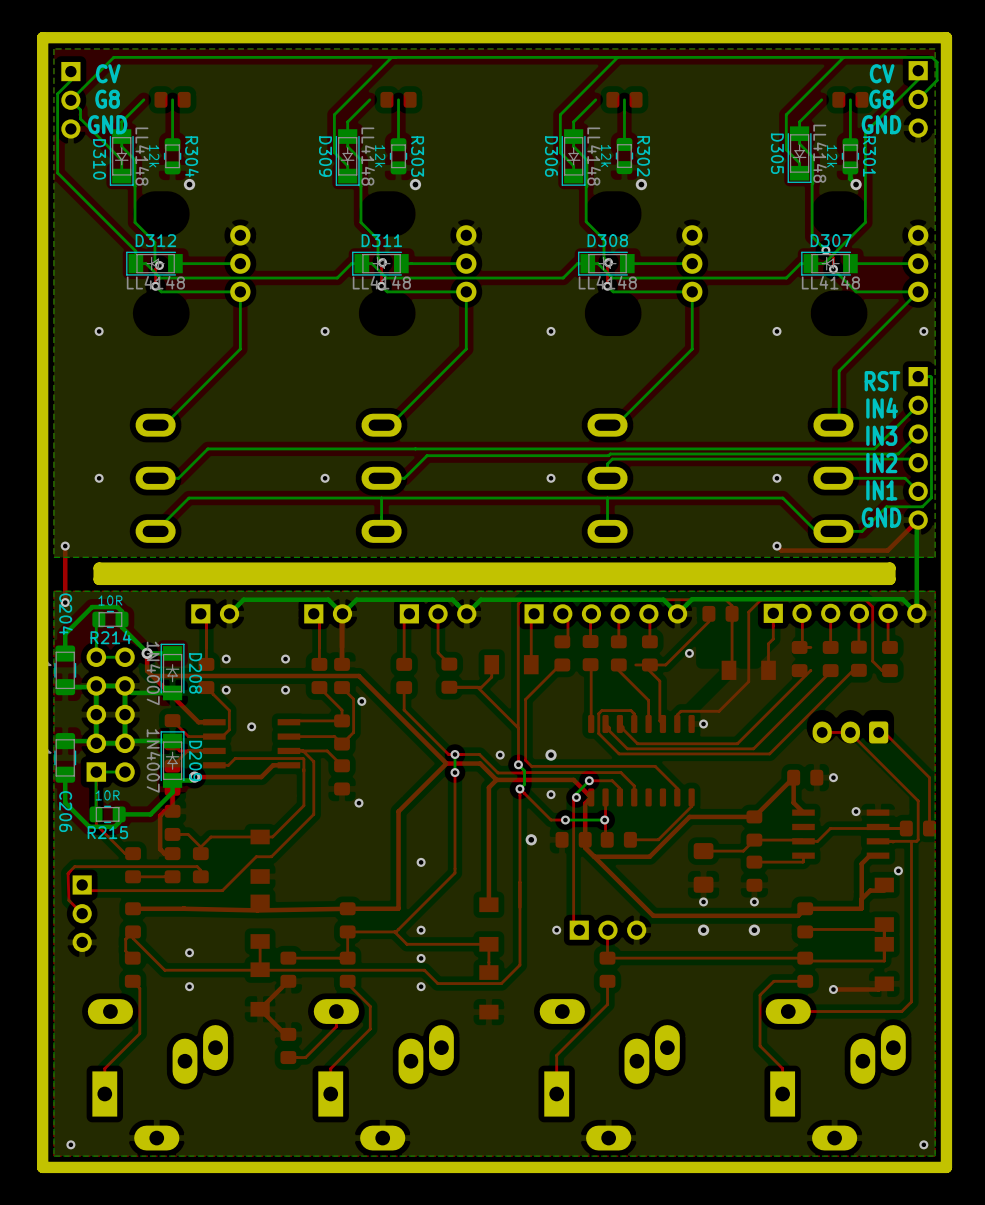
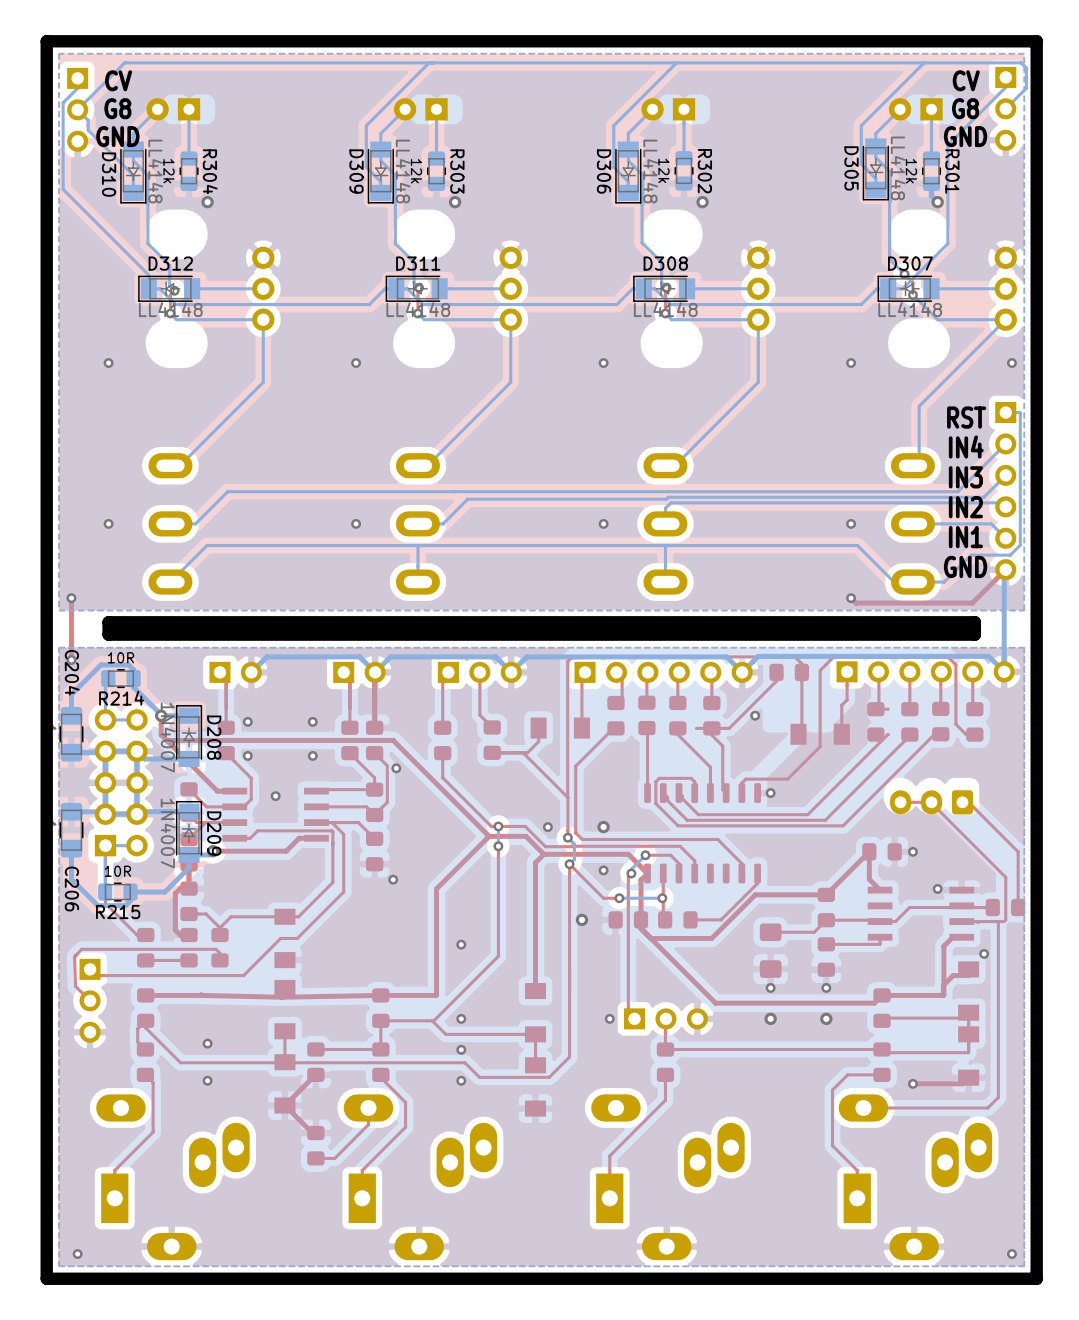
part: none -> (173, 109)
part: (172, 99) -> none
part: none -> (420, 109)
part: (398, 99) -> none
part: none -> (668, 109)
part: (624, 99) -> none
part: none -> (915, 109)
part: (850, 99) -> none

